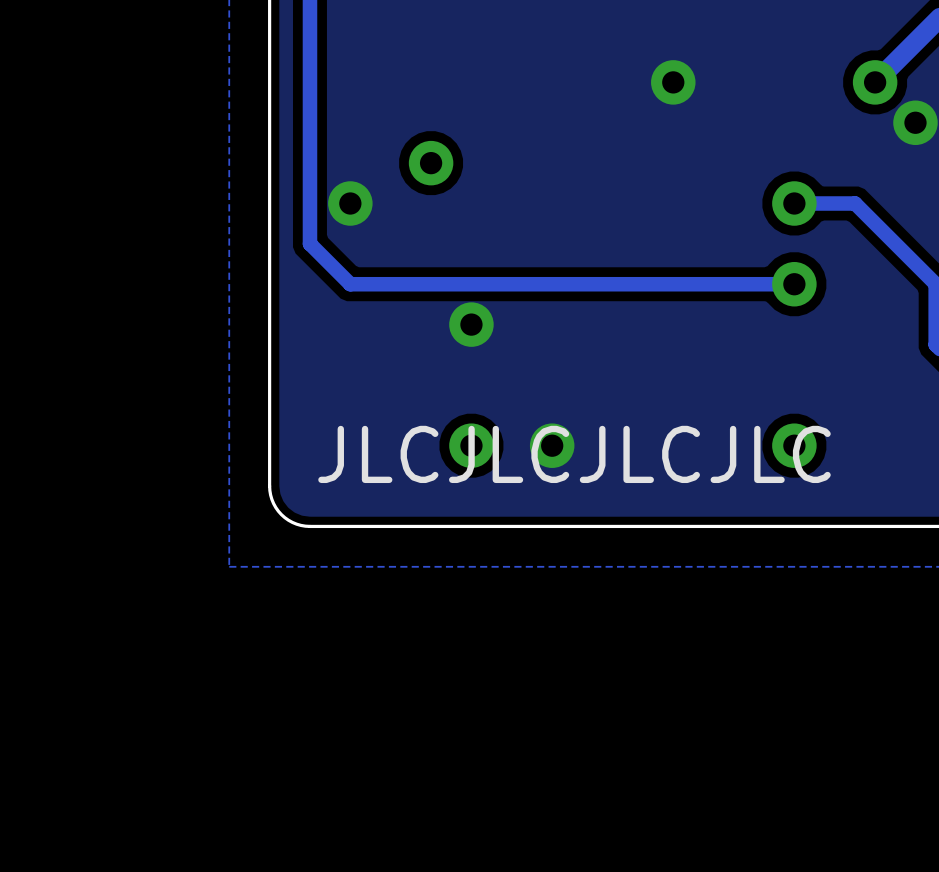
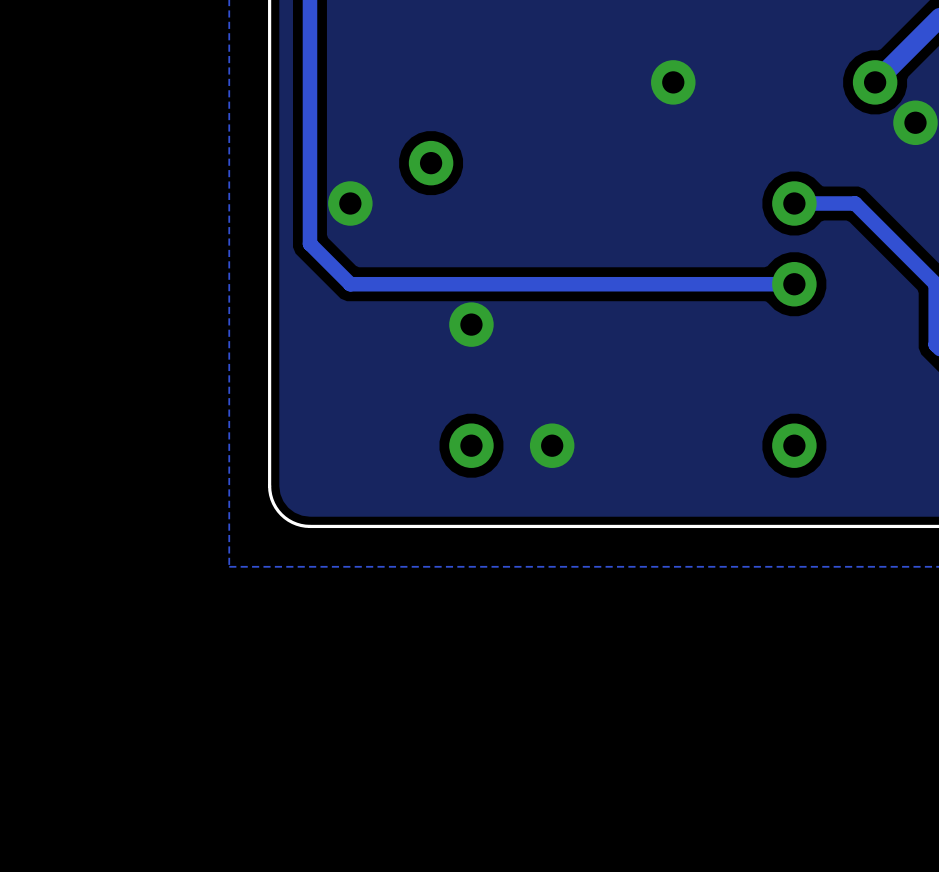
text: JLCJLCJLCJLC (574, 454) -> none

